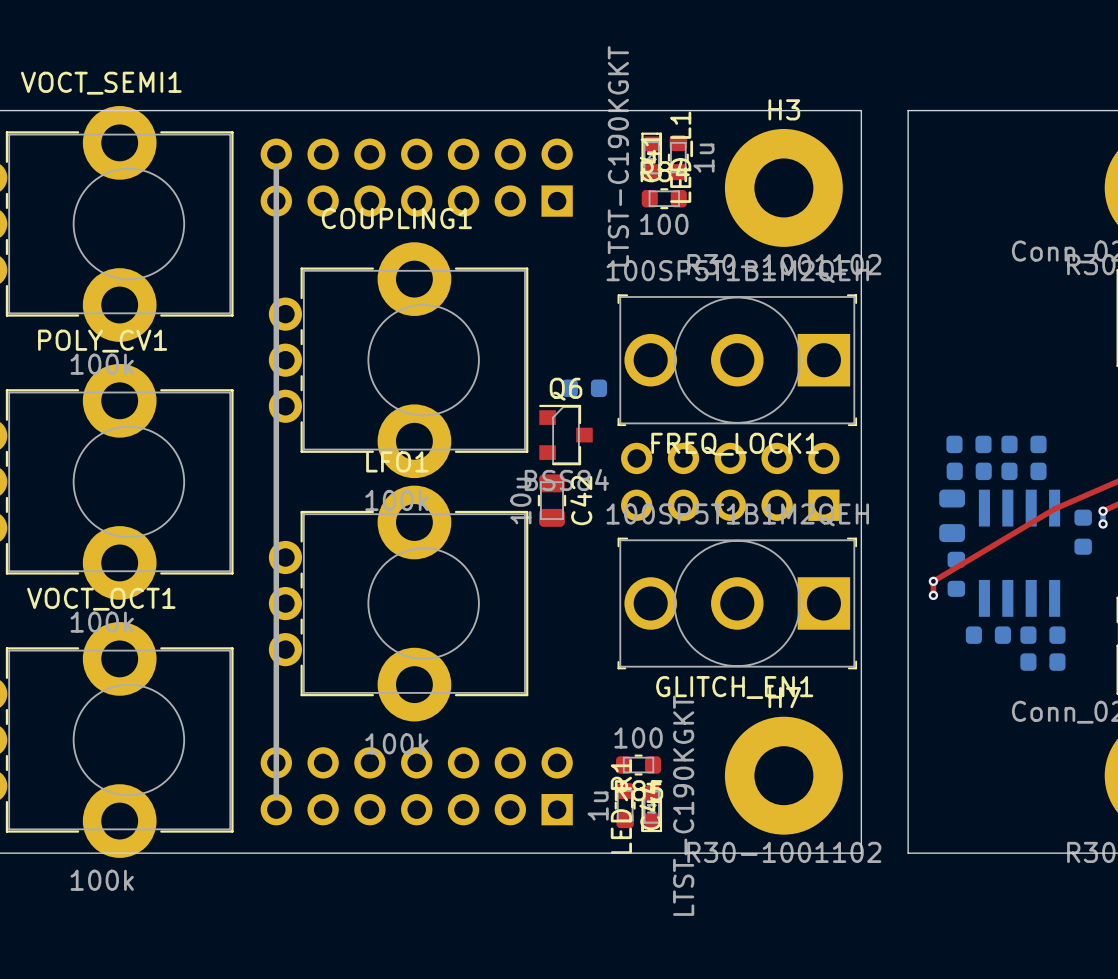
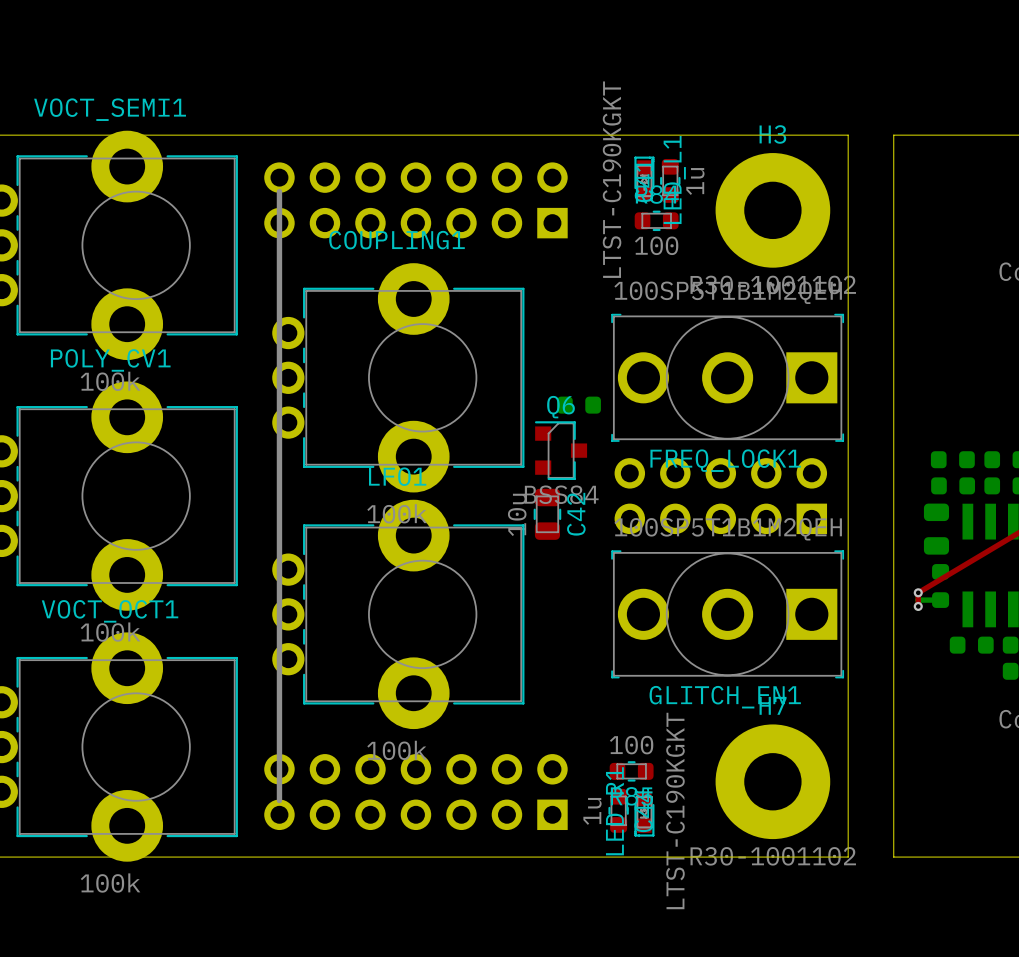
bottom track: none -> (918, 600) (940, 600)

